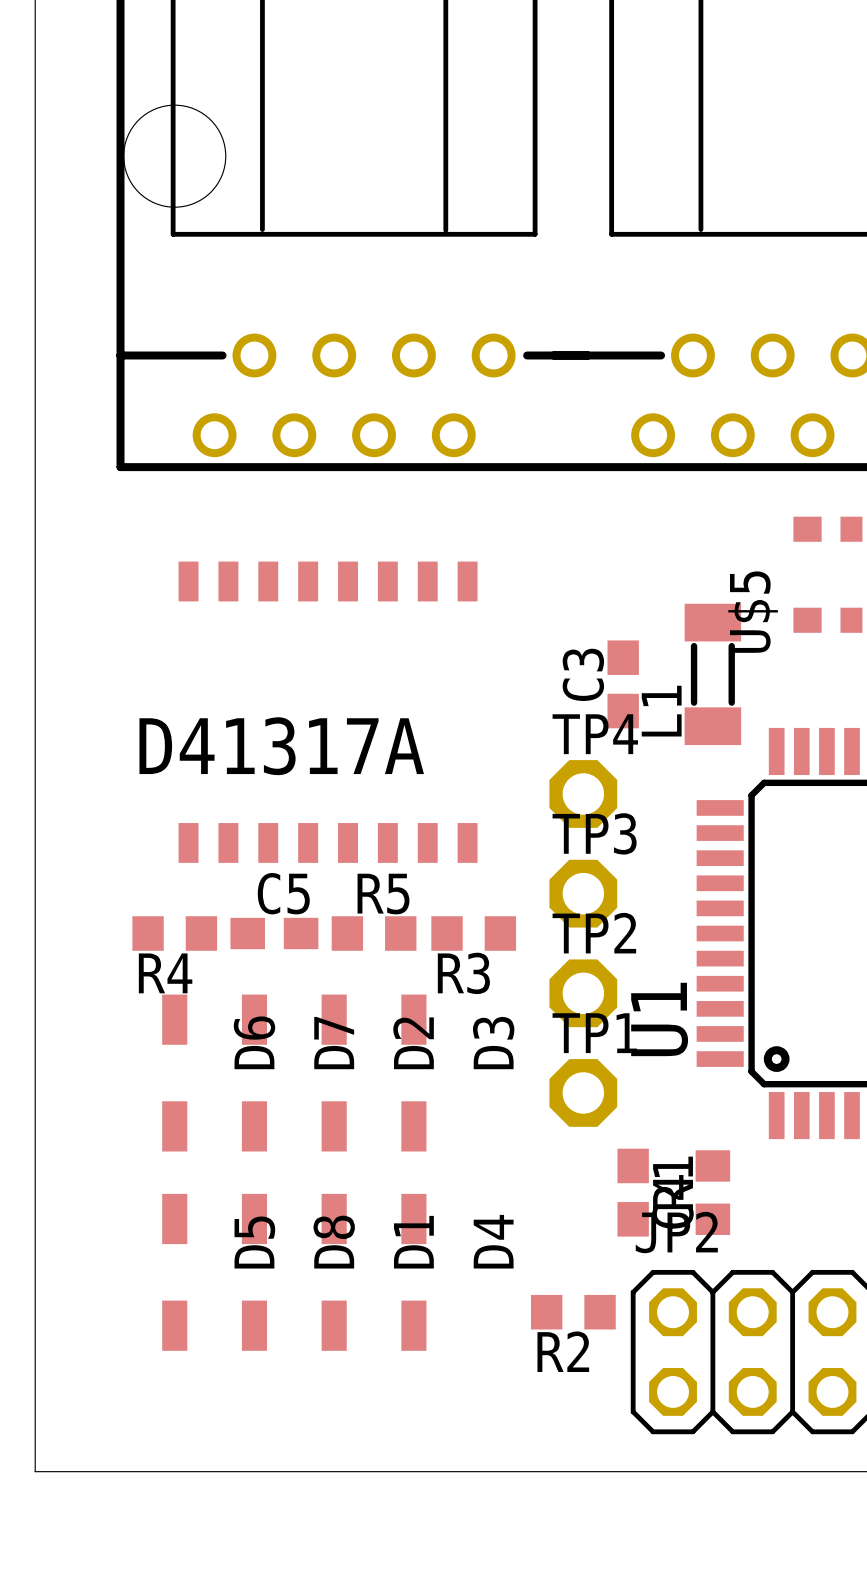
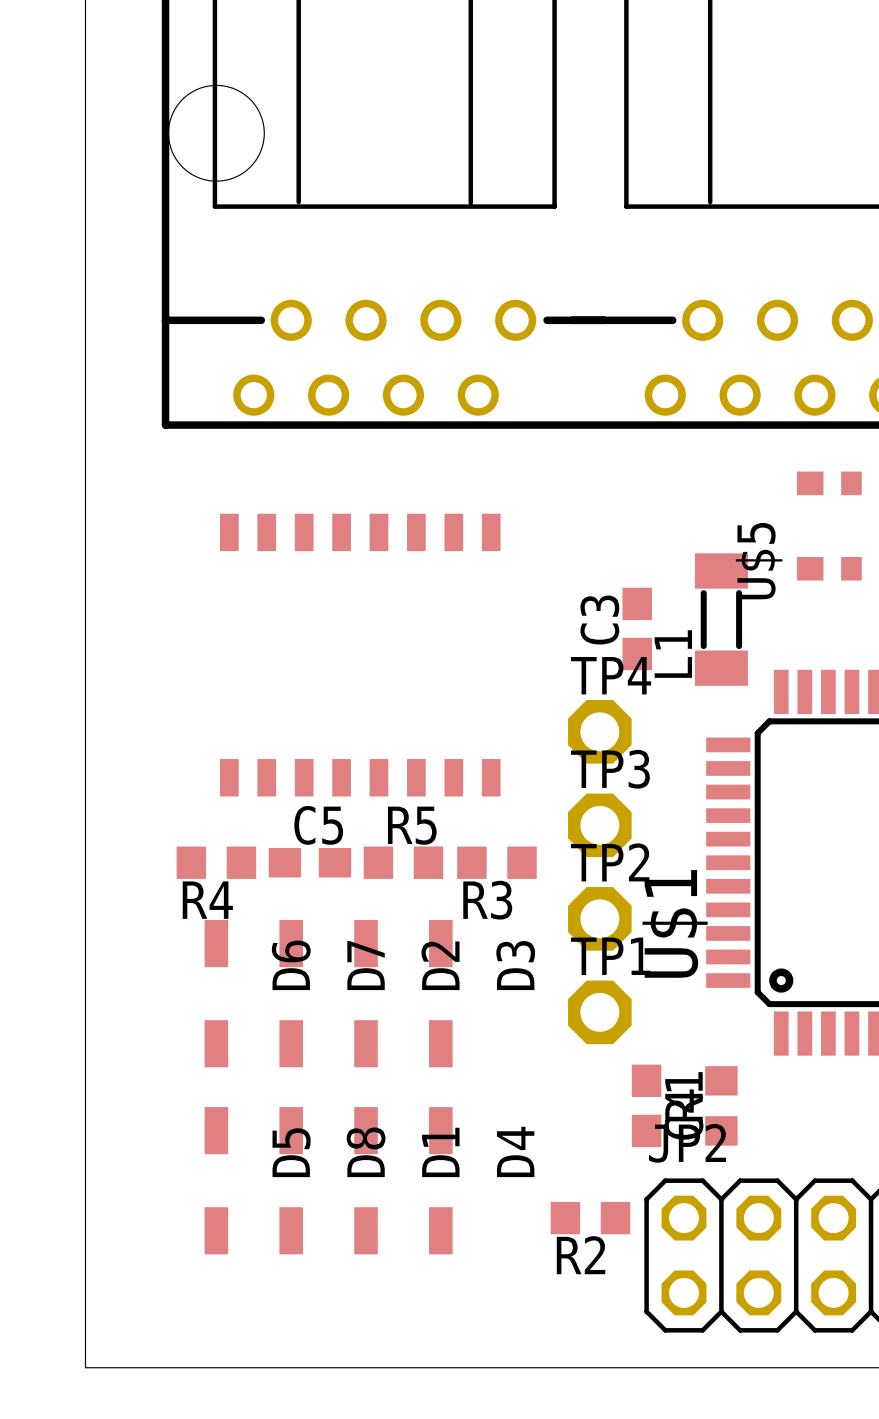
text: D41317A (281, 746) -> none
U1 name: U1 (659, 1019) -> U$1 (675, 923)

